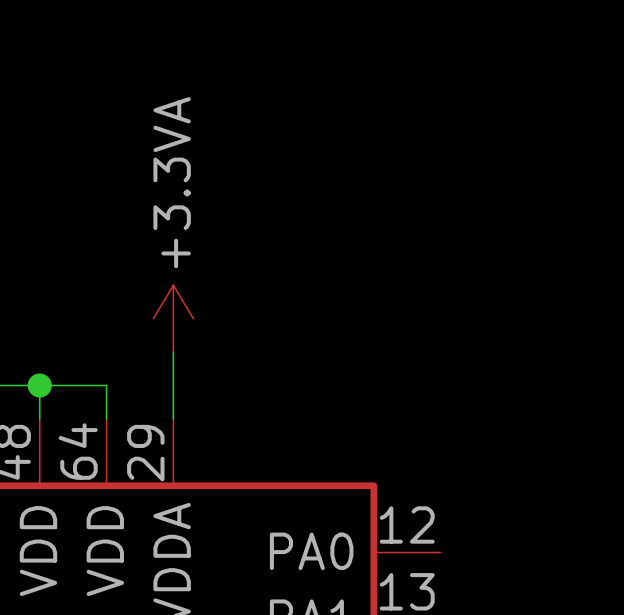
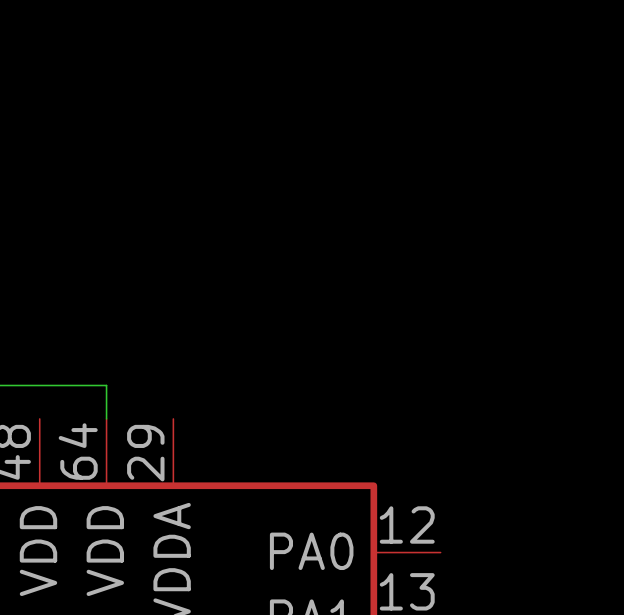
power symbol: +3.3VA (173, 318) -> none
wire: (173, 352) (173, 418) -> none
wire: (39, 385) (39, 418) -> none
junction: (39, 385) -> none

